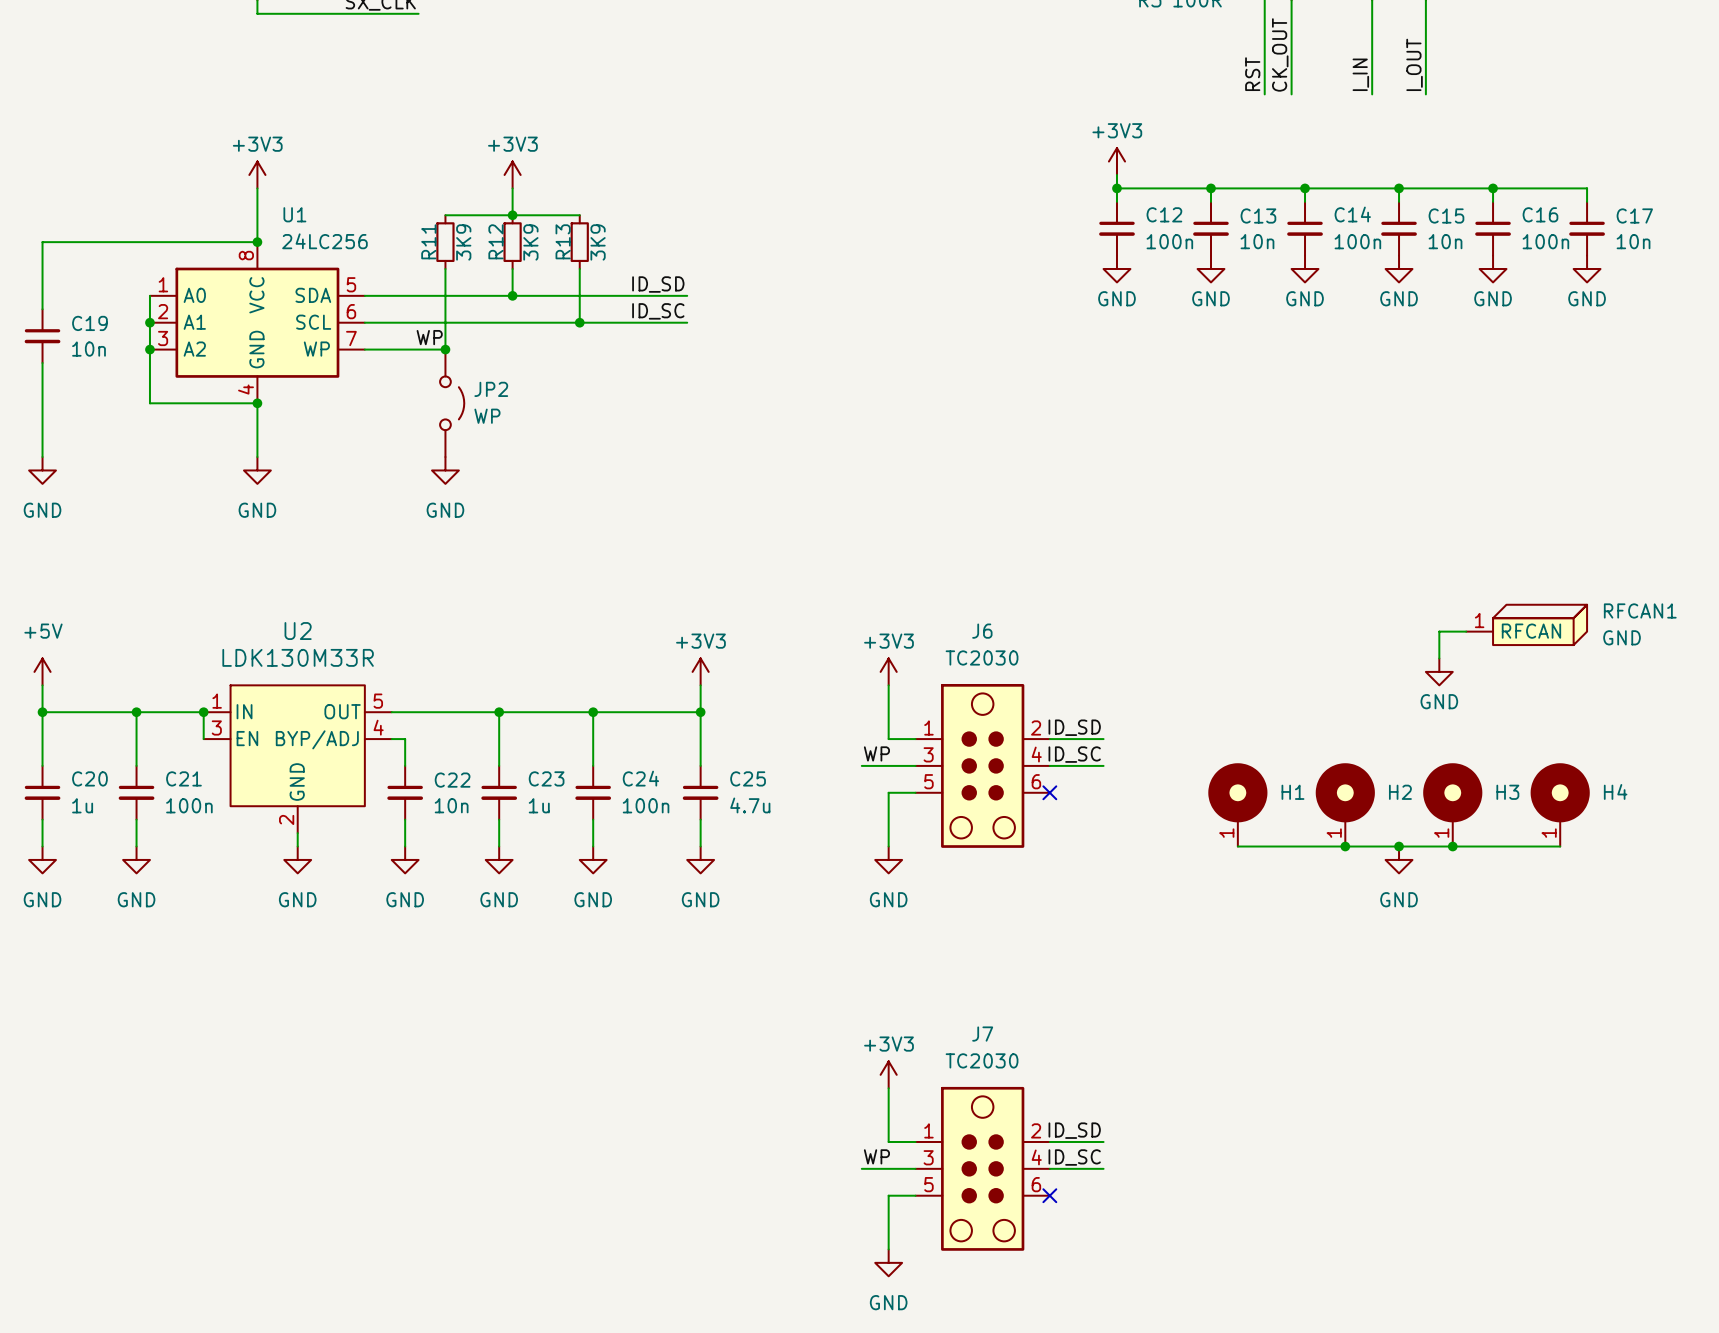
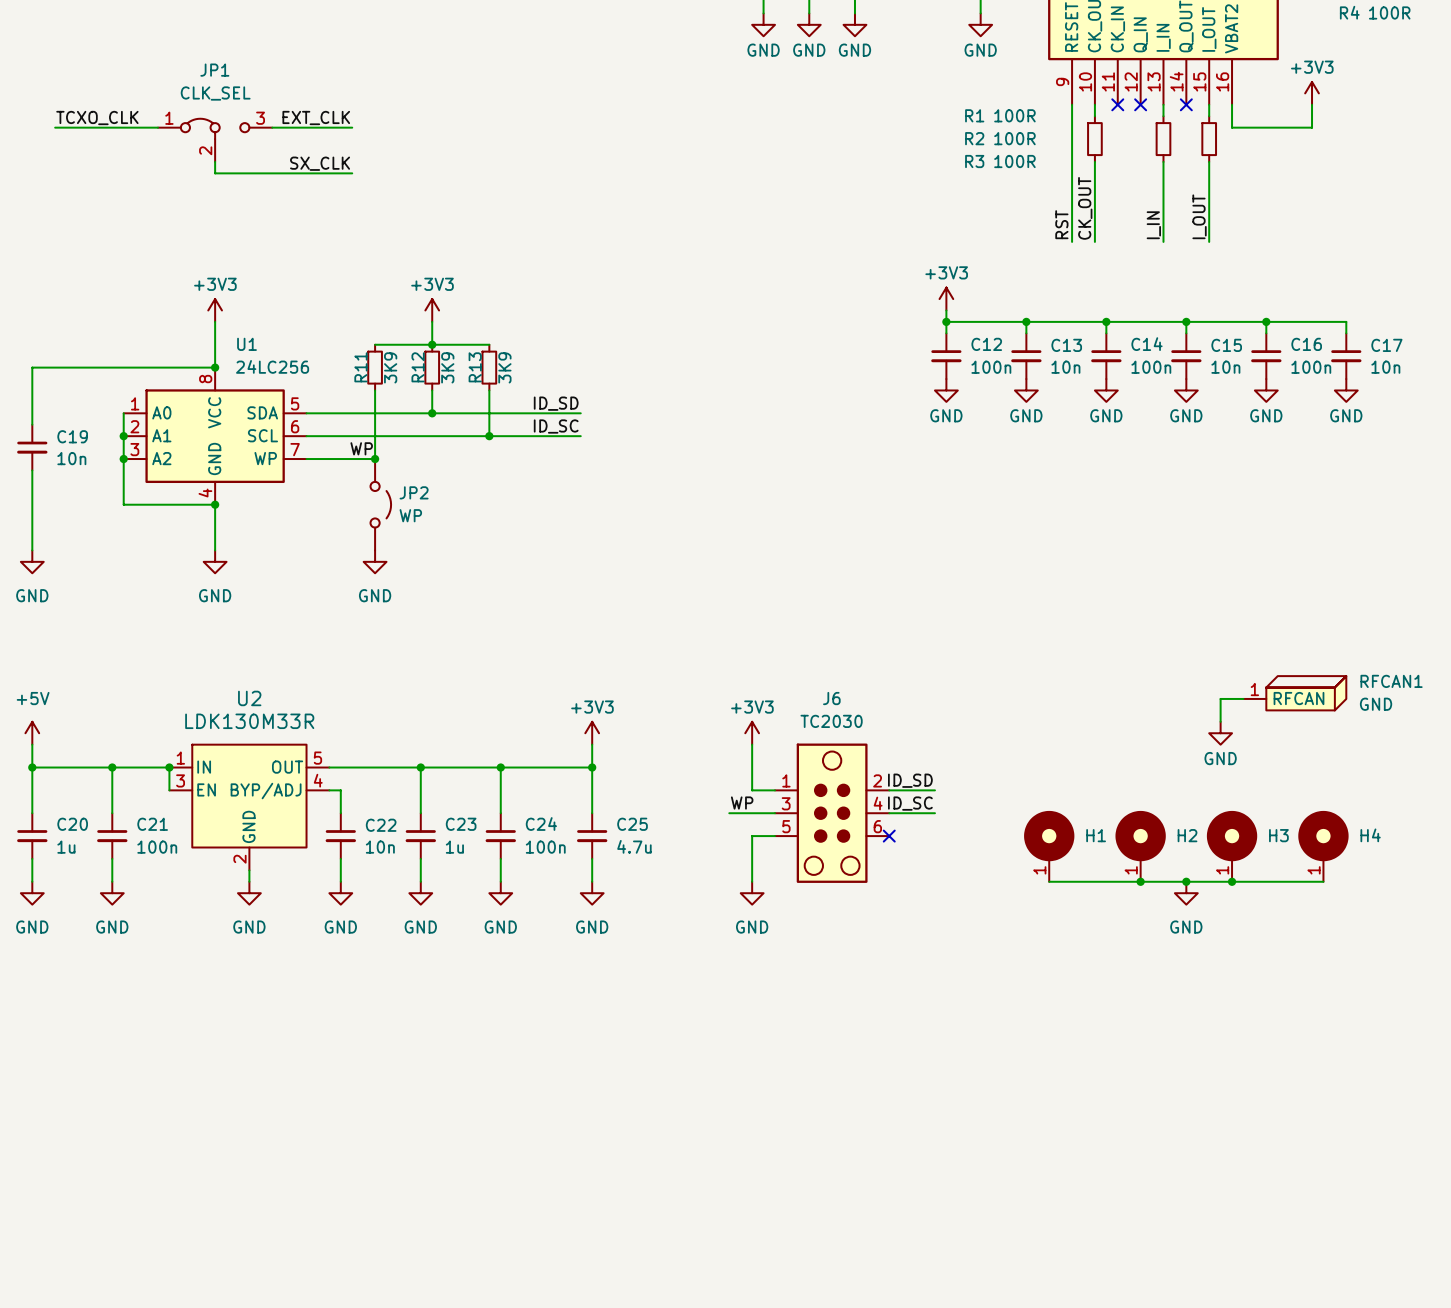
power symbol: +3V3 (888, 1074) -> none
wire: (888, 1088) (888, 1141) (915, 1141) -> none
label: ID_SD (1074, 1130) -> none
wire: (1049, 1141) (1103, 1141) -> none
label: WP (876, 1156) -> none
label: ID_SC (1074, 1157) -> none
wire: (861, 1168) (915, 1168) -> none
J7: TC2030 (982, 1168) -> none
wire: (1049, 1168) (1103, 1168) -> none
wire: (915, 1195) (888, 1195) (888, 1249) -> none
no-connect mark: (1049, 1195) -> none
power symbol: GND (888, 1262) -> none

